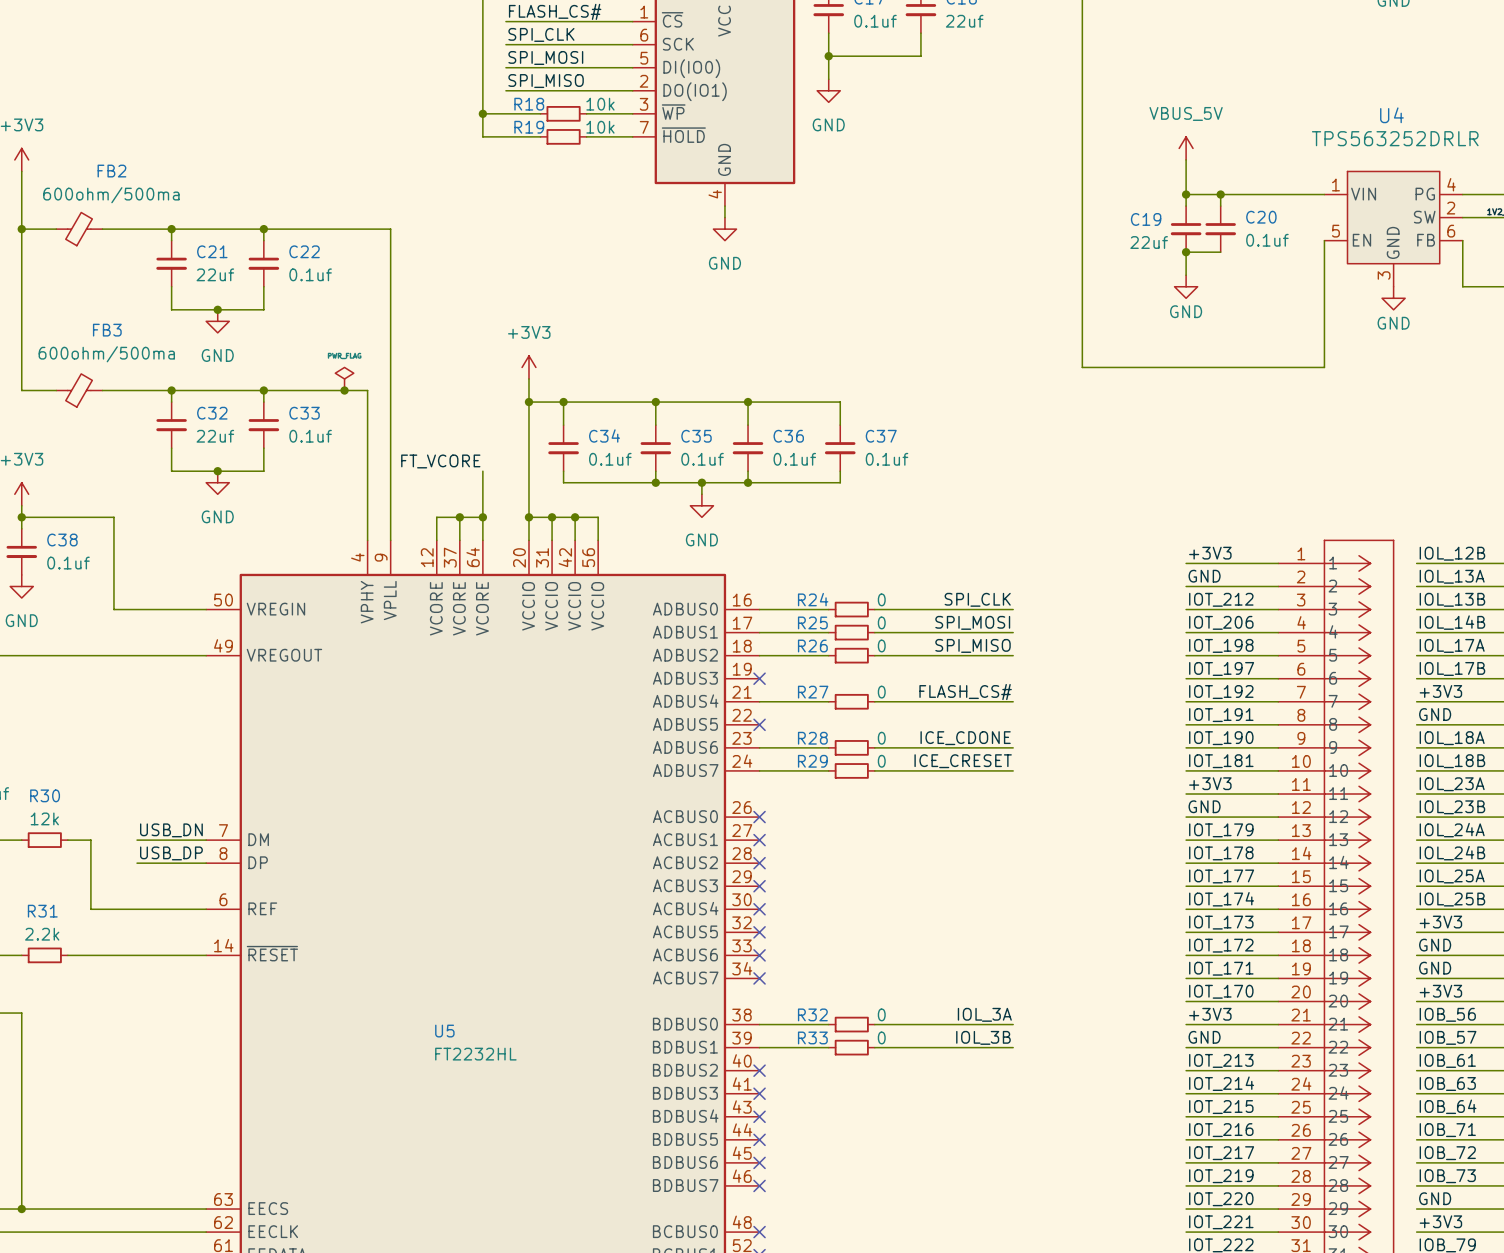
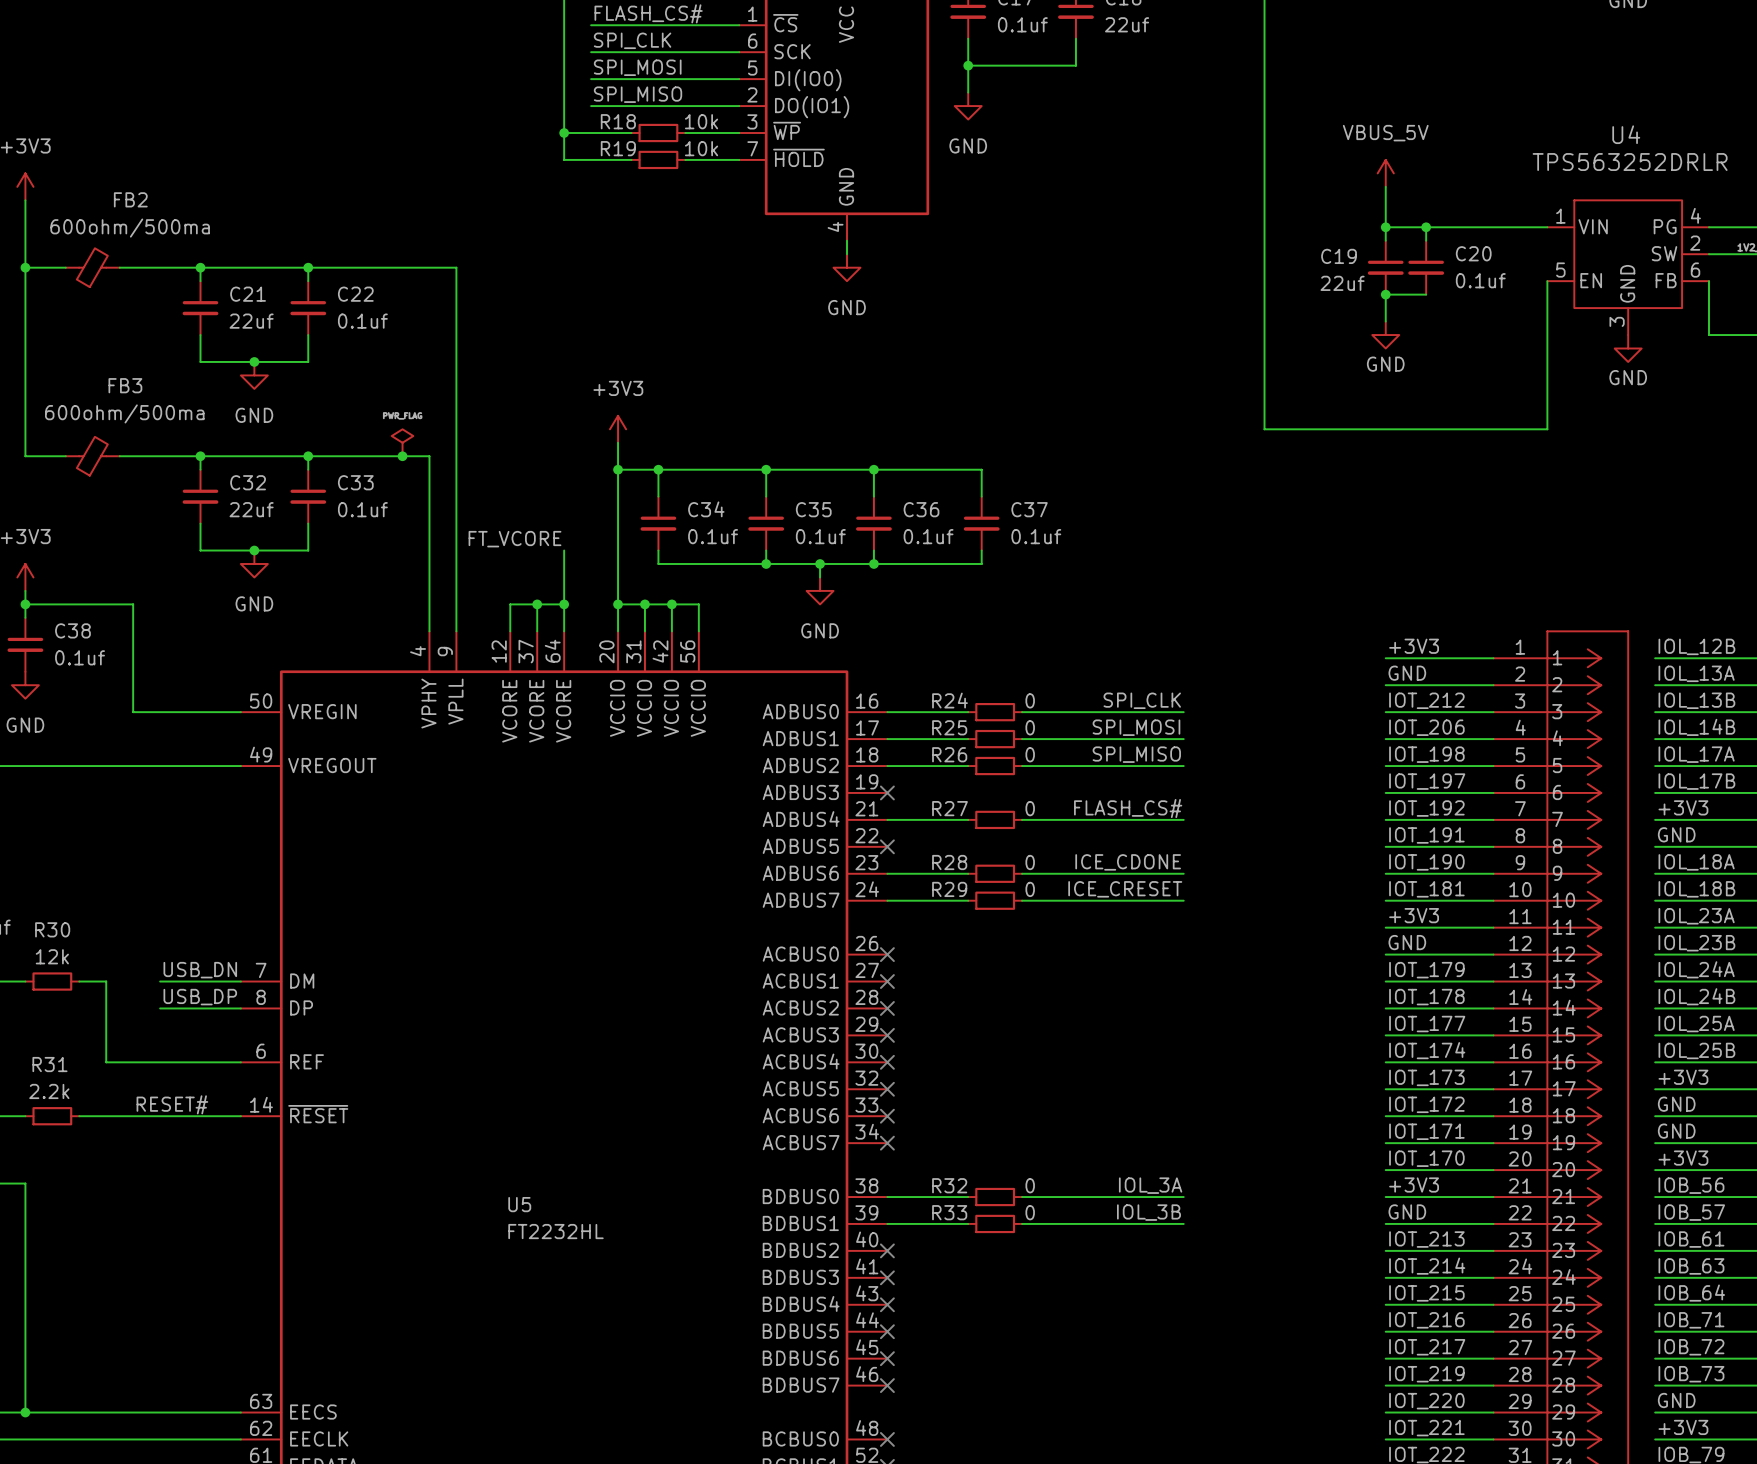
label: none -> RESET# (172, 1104)

